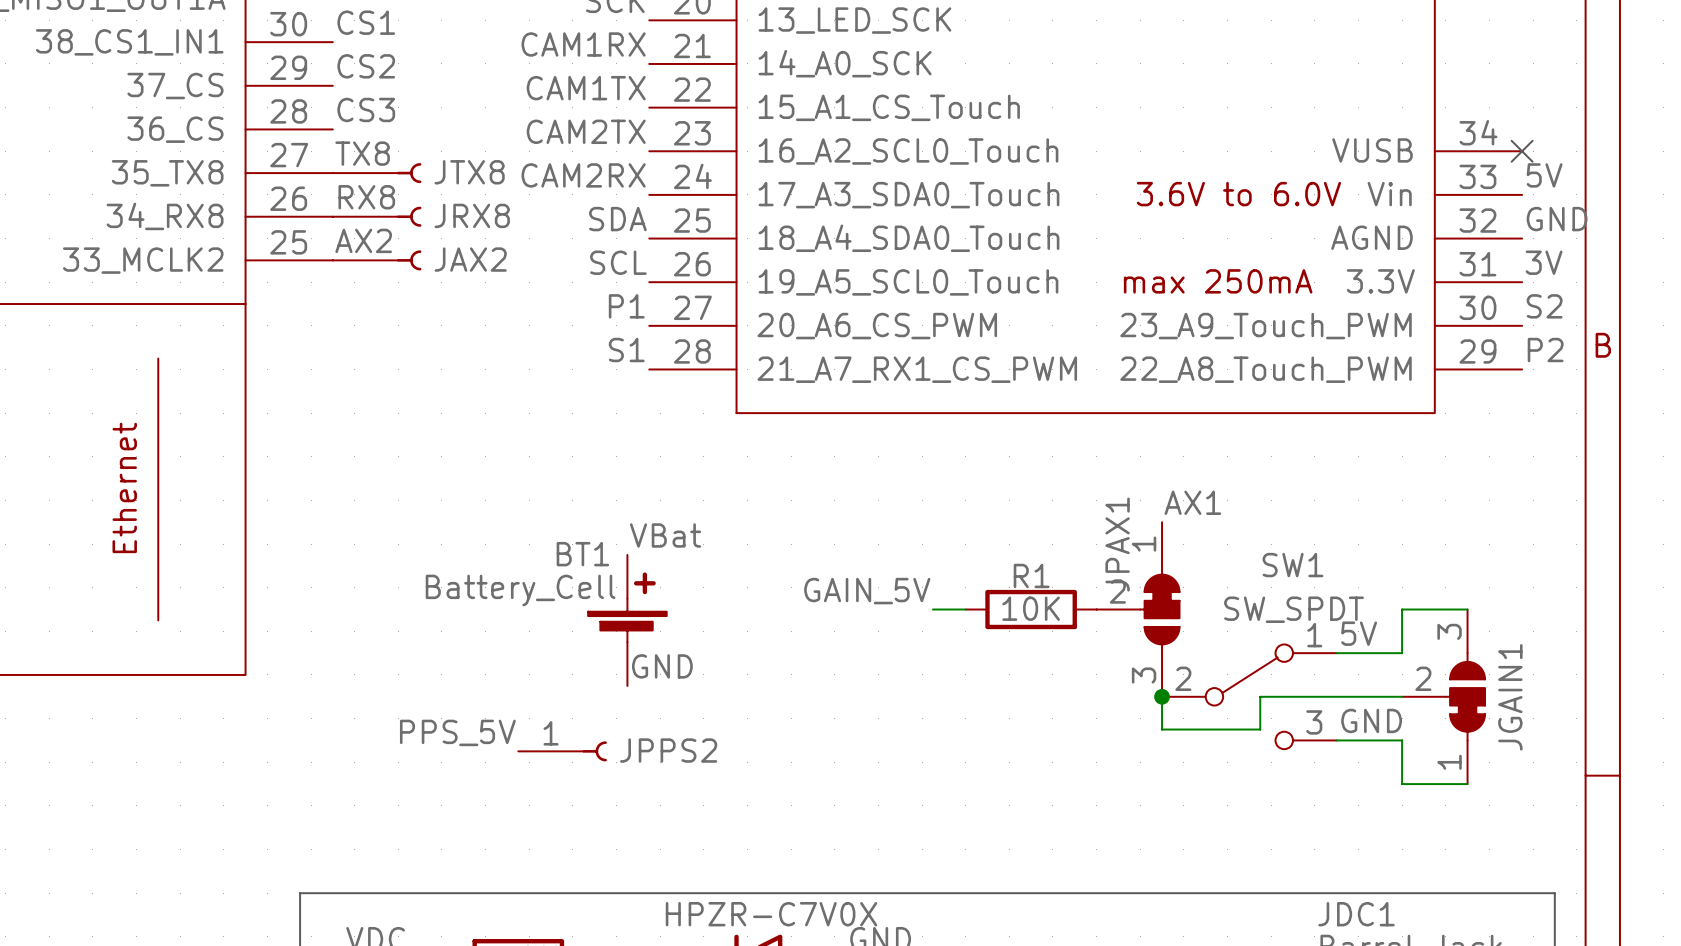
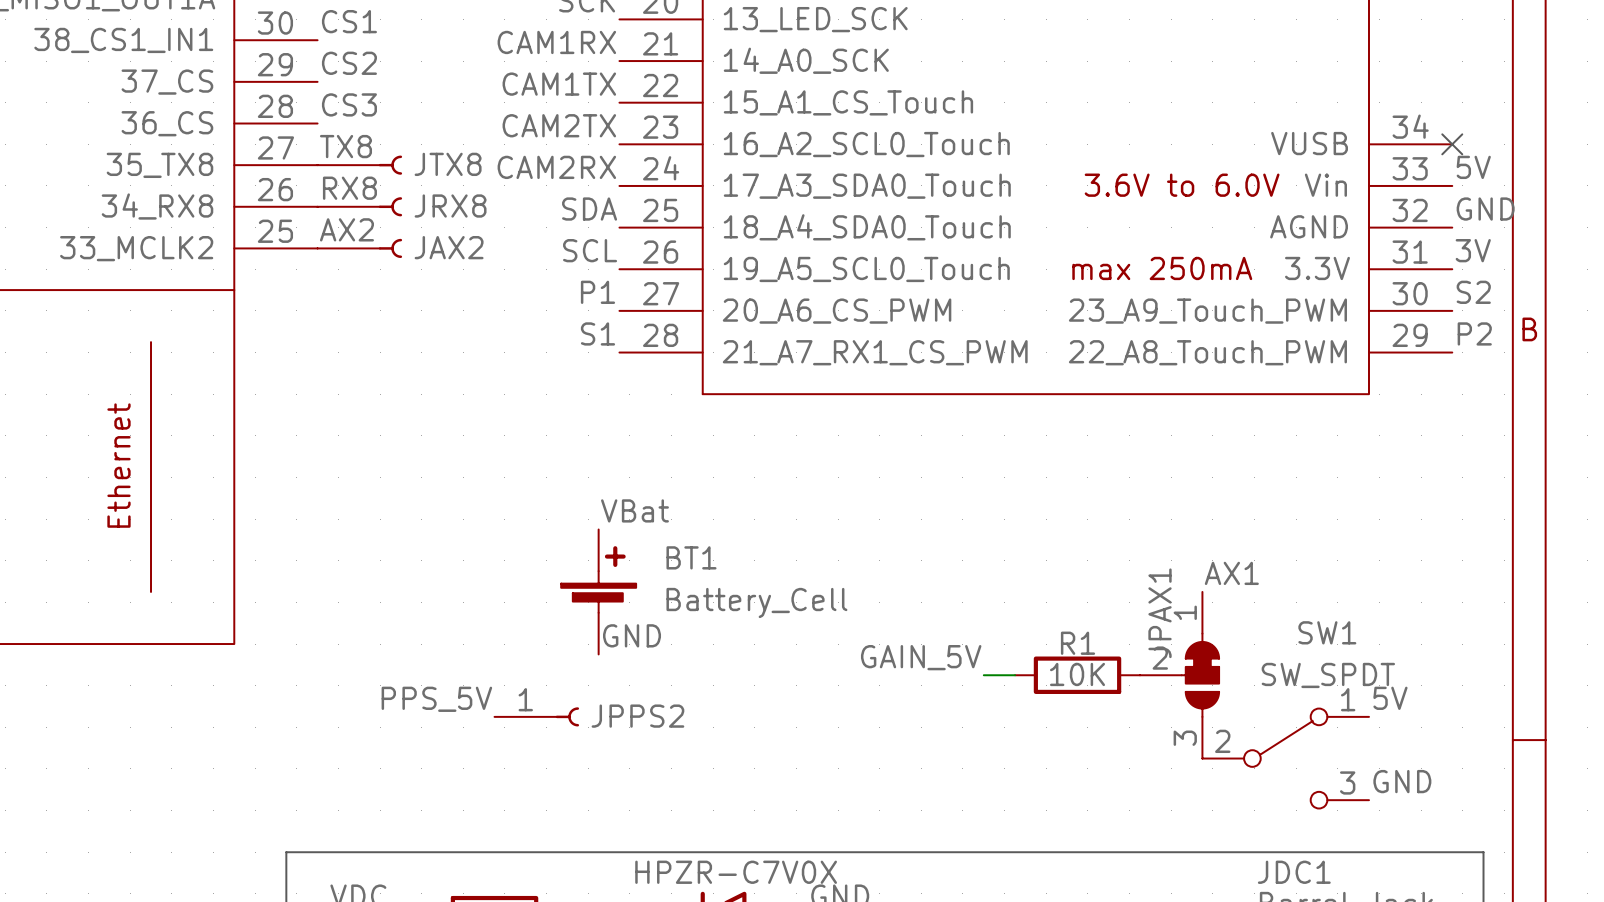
label position: AX1 (1192, 502) -> AX1 (1231, 573)
BT1 name position: BT1 (582, 554) -> BT1 (691, 557)
BT1 value position: Battery_Cell (520, 590) -> Battery_Cell (756, 602)
label position: GAIN_5V (867, 591) -> GAIN_5V (921, 657)
wire: (932, 609) (965, 609) -> (983, 675) (1015, 675)
R1 position: (1031, 609) -> (1077, 675)
JPAX1 position: (1138, 609) -> (1179, 675)
wire: (1467, 609) (1402, 609) (1402, 653) (1336, 653) -> none
label position: 5V (1359, 633) -> 5V (1390, 698)
wire: (1162, 696) (1162, 729) (1260, 729) (1260, 696) (1402, 696) -> none
junction: (1162, 696) -> none
SW1 position: (1249, 696) -> (1285, 758)
JGAIN1: (1443, 696) -> none
label position: GND (1371, 720) -> GND (1402, 781)
wire: (1336, 740) (1402, 740) (1402, 784) (1467, 784) -> none

